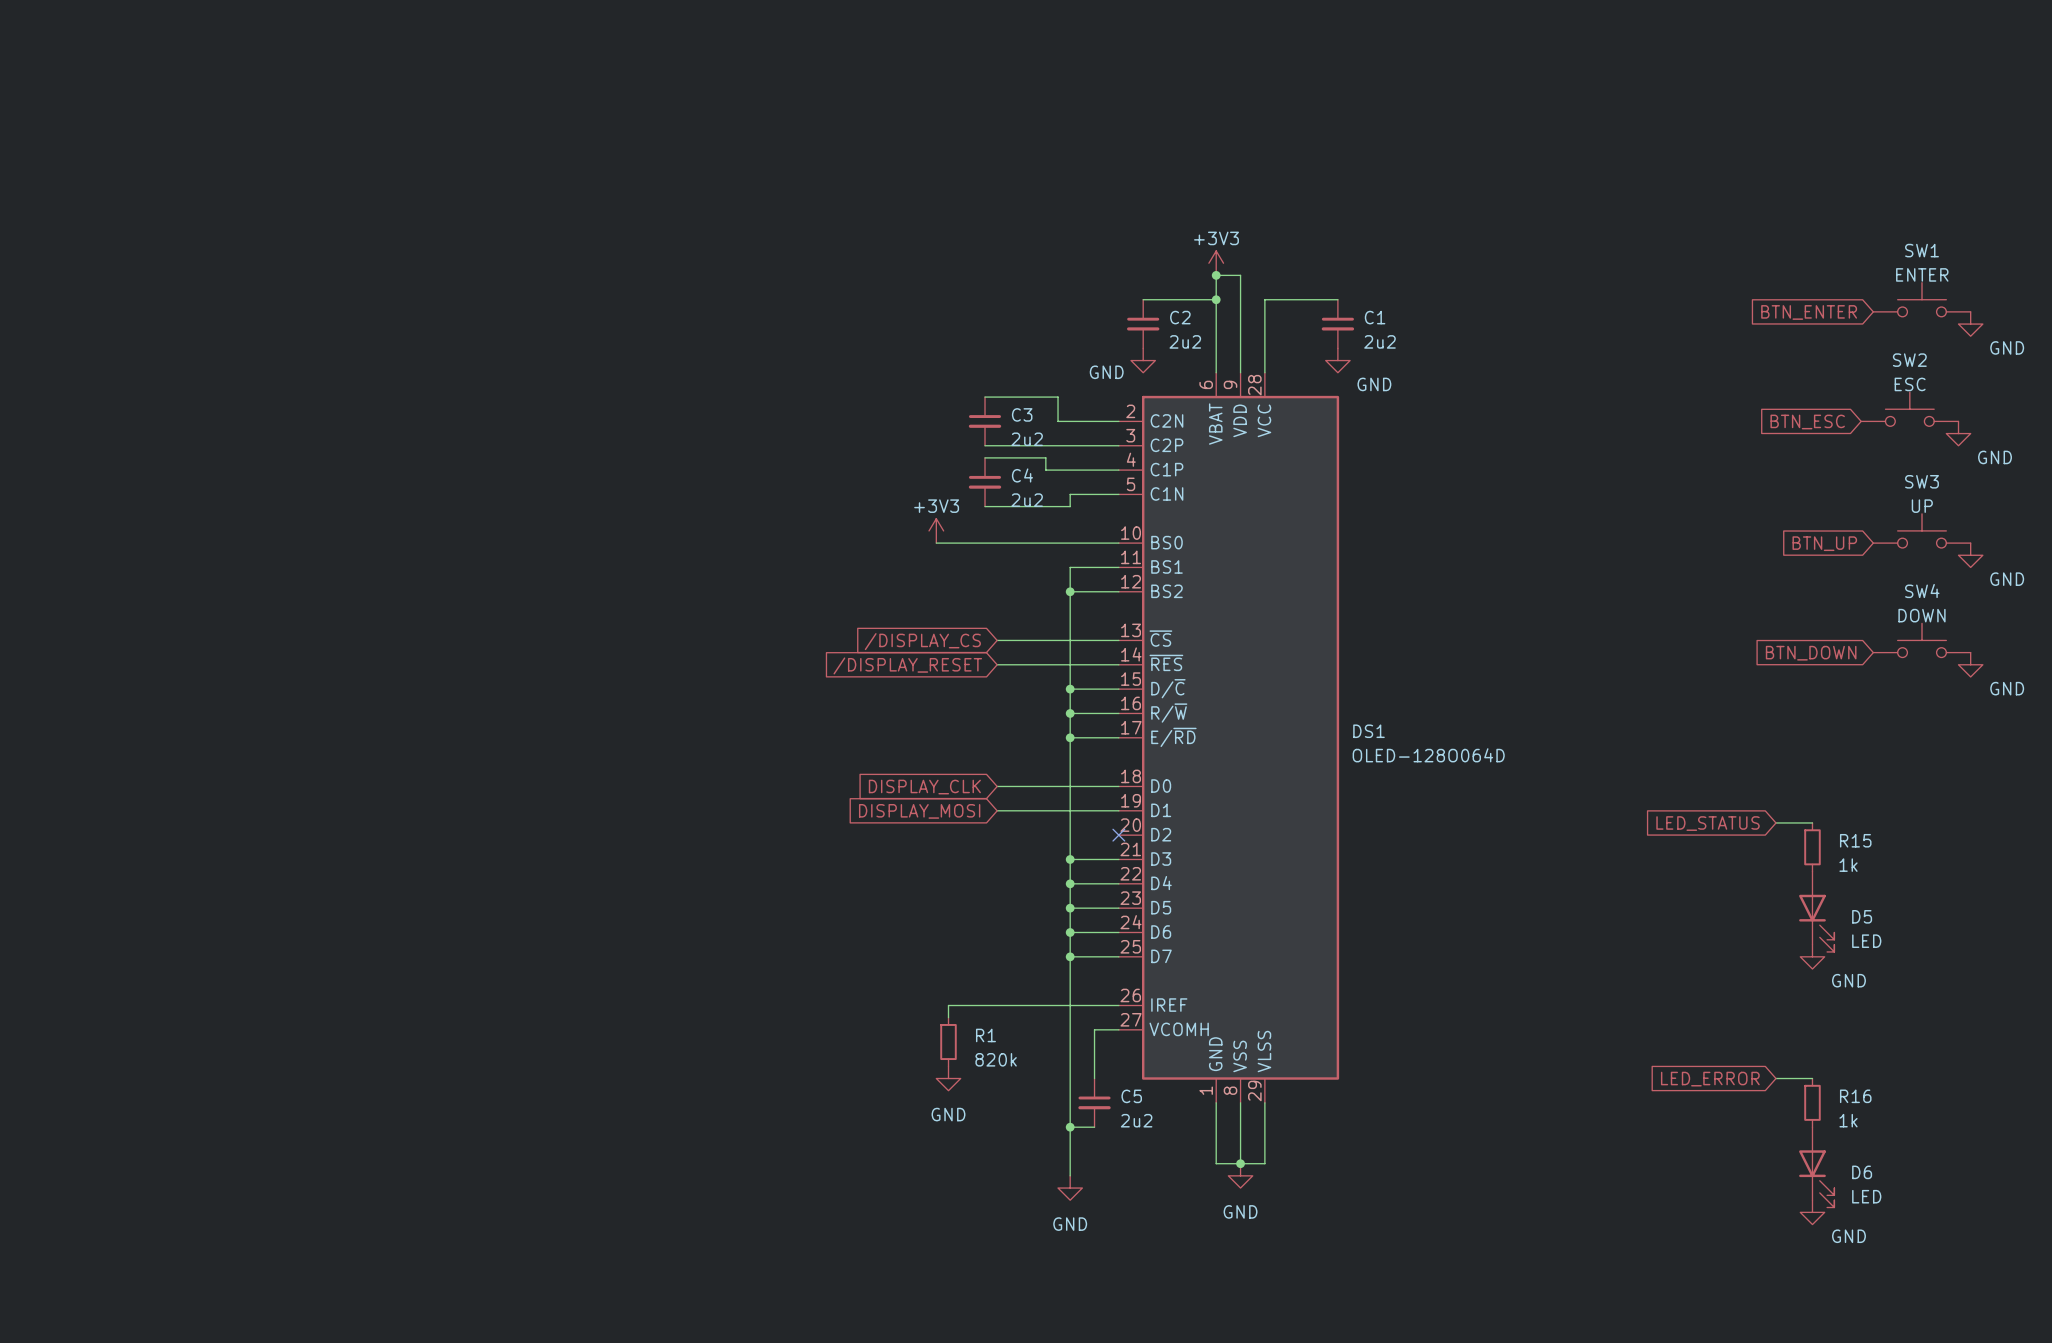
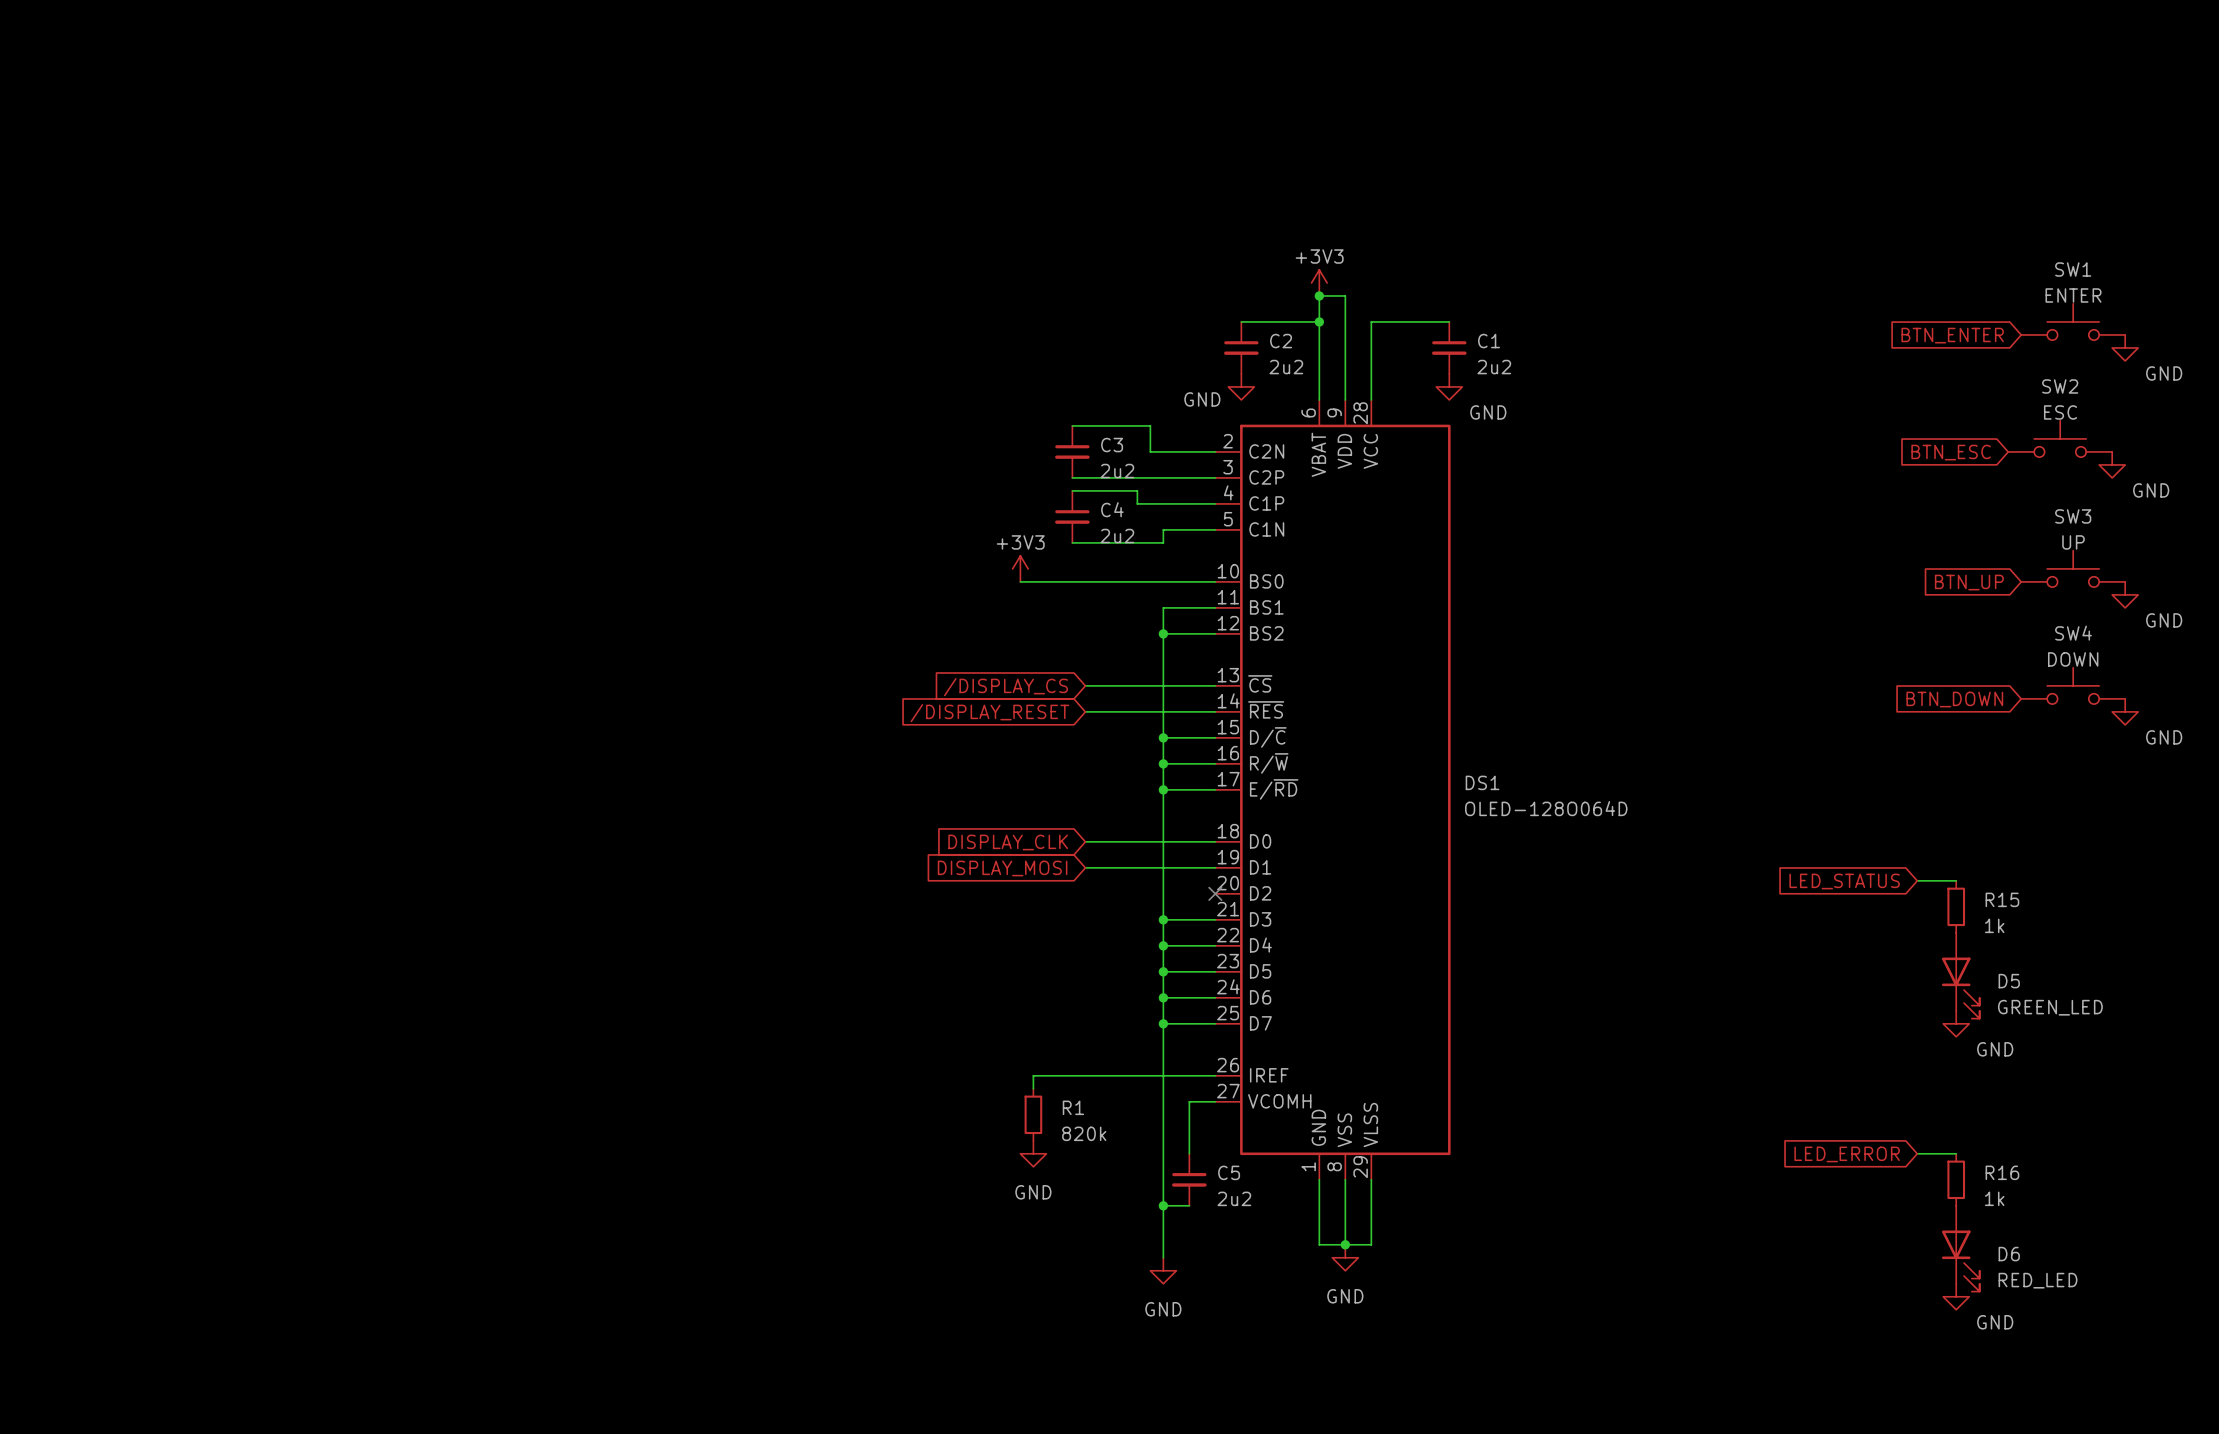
D5 value: LED (1866, 941) -> GREEN_LED (2050, 1007)
D6 value: LED (1866, 1196) -> RED_LED (2038, 1280)

